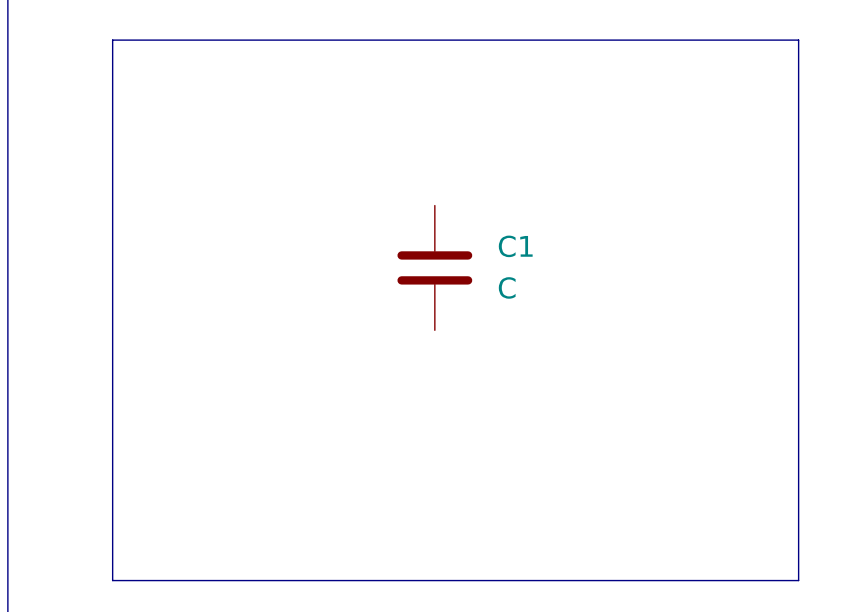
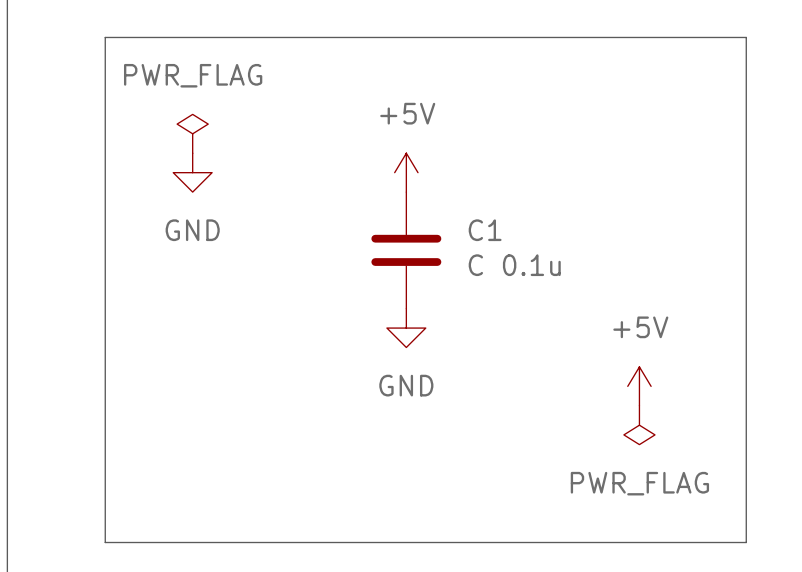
power symbol: none -> PWR_FLAG (192, 133)
power symbol: none -> GND (192, 172)
power symbol: none -> +5V (406, 172)
C1 value: C (507, 287) -> C 0.1u (514, 265)
power symbol: none -> GND (406, 328)
power symbol: none -> +5V (639, 386)
power symbol: none -> PWR_FLAG (639, 425)

